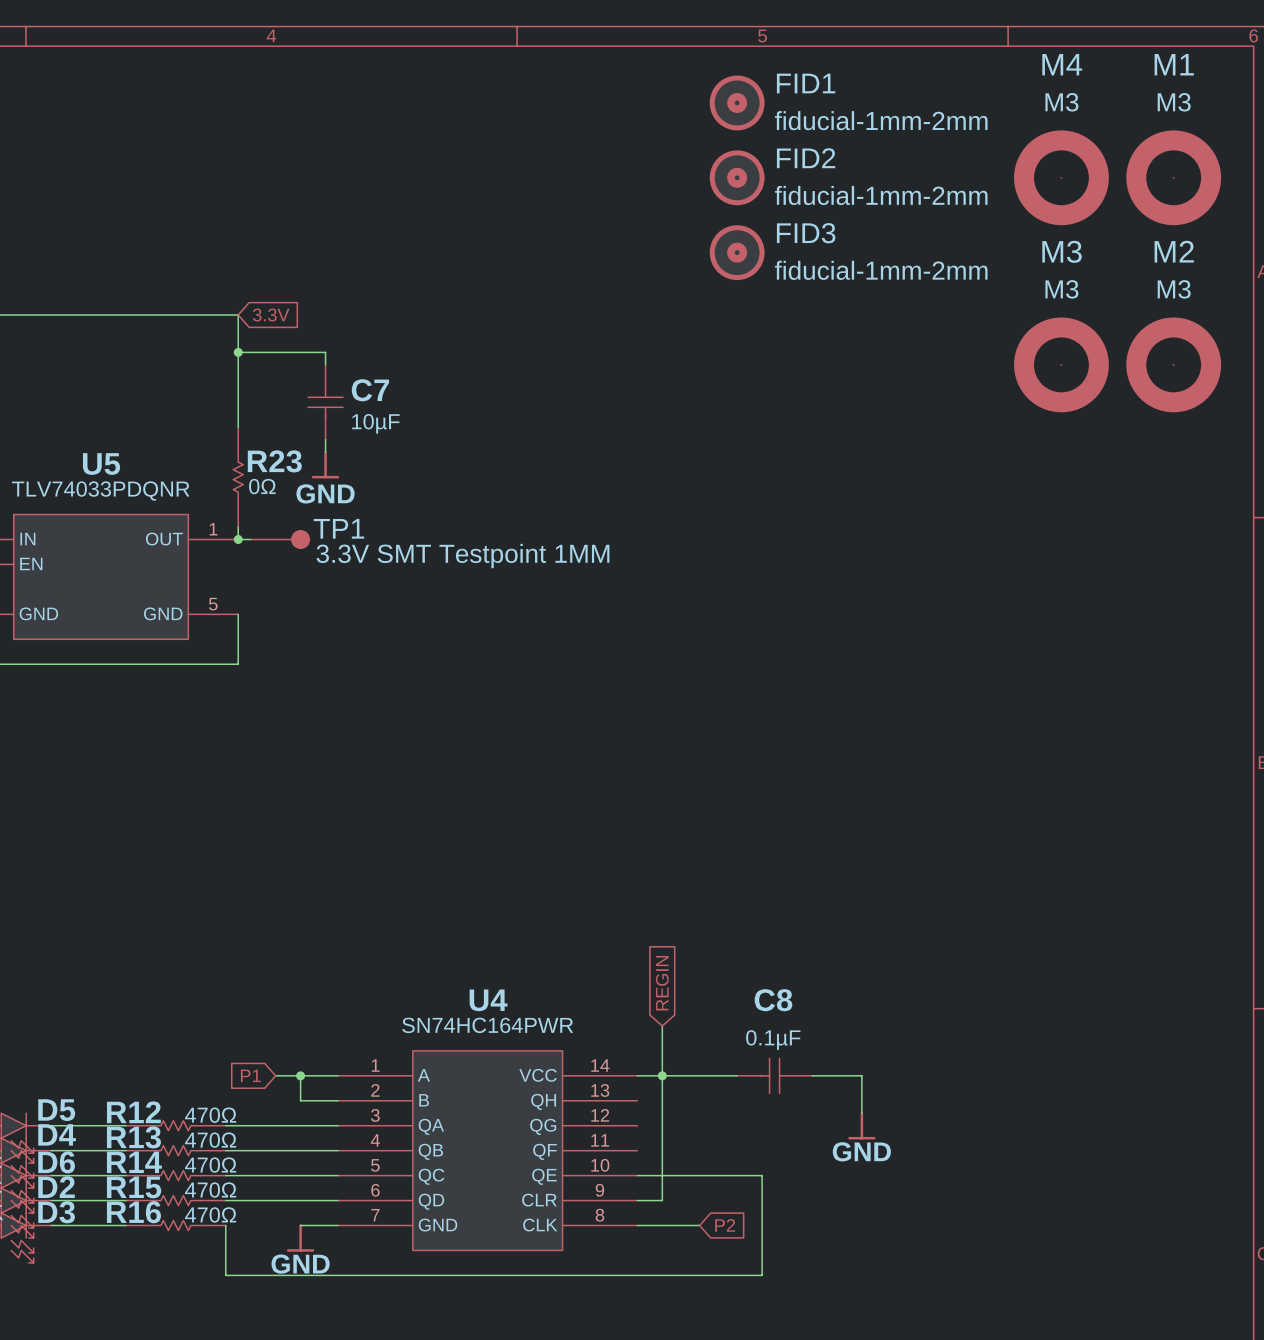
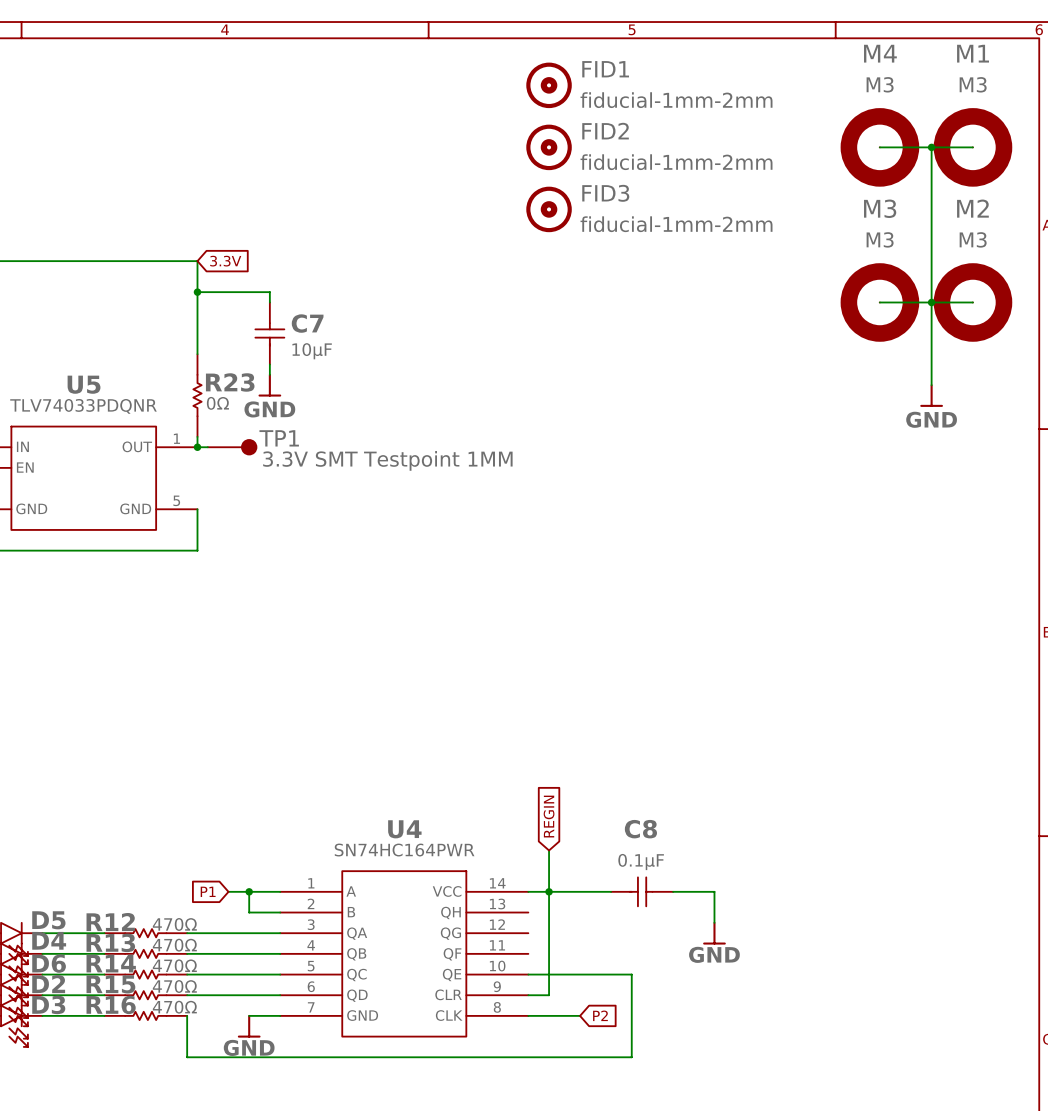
FID1 position: (737, 102) -> (549, 85)
FID2 position: (737, 177) -> (549, 147)
wire: none -> (879, 147) (972, 147)
wire: none -> (931, 147) (931, 385)
junction: none -> (931, 147)
FID3 position: (737, 252) -> (549, 209)
wire: none -> (879, 302) (972, 302)
junction: none -> (931, 302)
power symbol: none -> GND (931, 395)

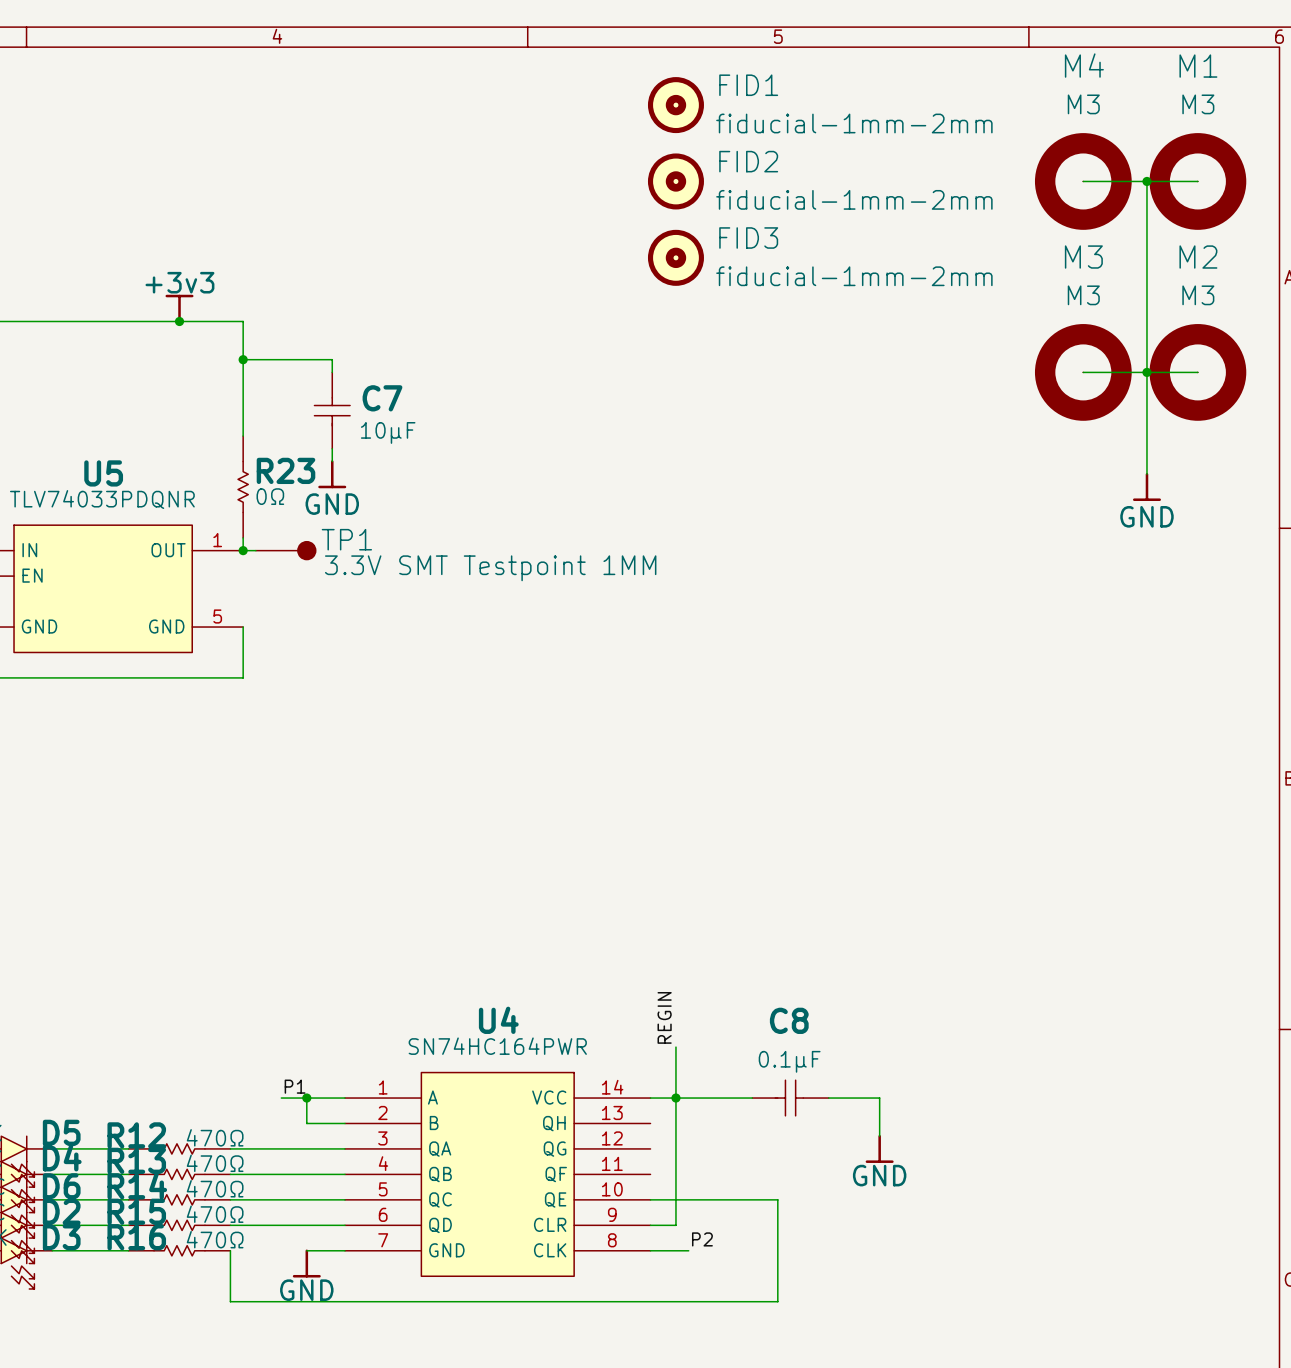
power symbol: none -> +3v3 (179, 308)
junction: none -> (179, 321)
global label: 3.3V (225, 261) -> none
global label: REGIN (549, 816) -> none
label: none -> REGIN (664, 1017)
label: none -> P1 (295, 1086)
global label: P1 (208, 891) -> none
label: none -> P2 (702, 1239)
wire: (559, 1015) (580, 1015) -> none
global label: P2 (600, 1015) -> none

